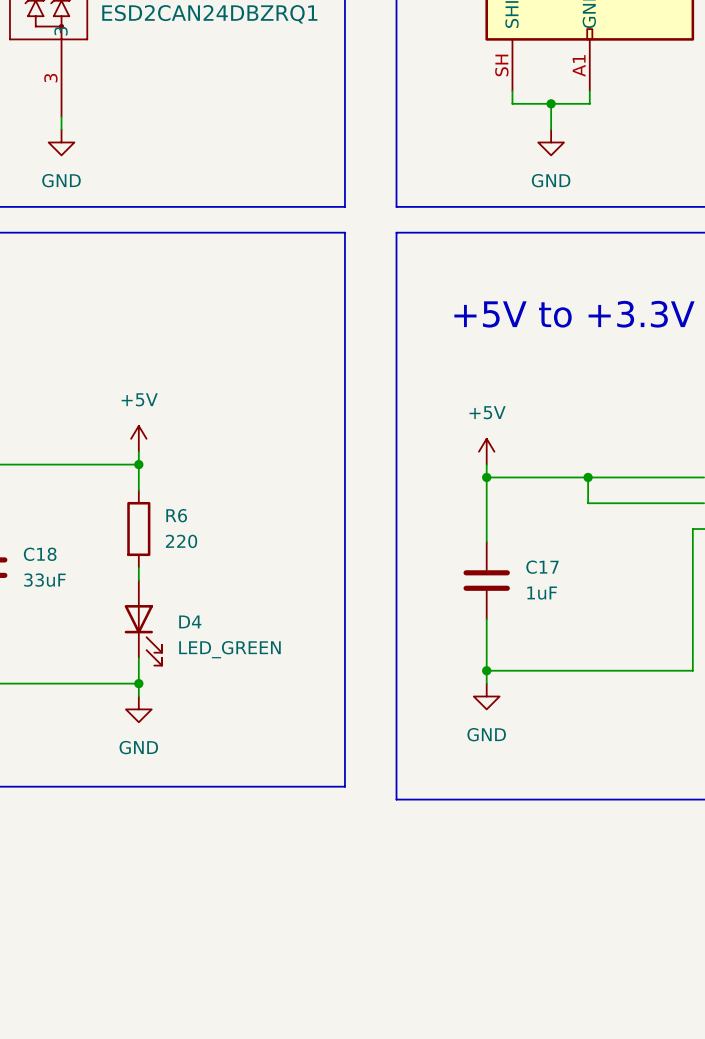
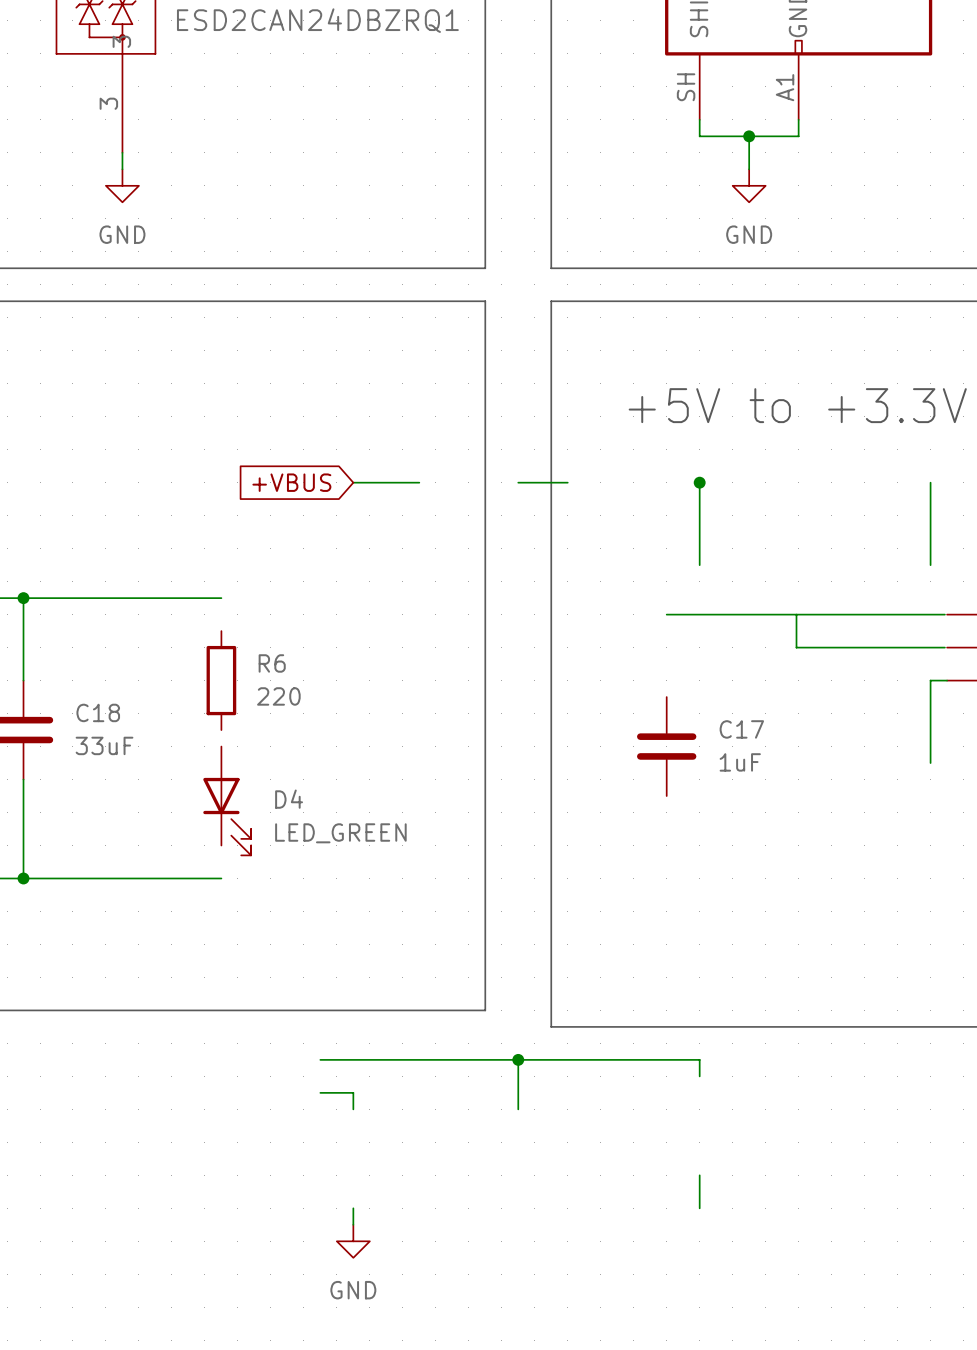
global label: none -> +VBUS (291, 482)
wire: none -> (353, 482) (419, 482)
wire: none -> (518, 482) (567, 482)
junction: none -> (699, 482)
wire: none -> (930, 482) (930, 565)
power symbol: +5V (138, 438) -> none
wire: (138, 451) (138, 490) -> none
power symbol: +5V (486, 451) -> none
junction: (138, 464) -> none
wire: (486, 464) (486, 541) -> none
junction: (486, 477) -> none
junction: (588, 477) -> none
wire: (138, 567) (138, 580) -> none
wire: (692, 593) (692, 670) (486, 670) -> none
wire: (486, 619) (486, 683) -> (699, 482) (699, 565)
wire: (138, 657) (138, 696) -> none
junction: (486, 670) -> none
junction: (138, 683) -> none
power symbol: GND (486, 696) -> none
power symbol: GND (138, 709) -> none
wire: none -> (320, 1059) (699, 1059) (699, 1076)
wire: none -> (518, 1059) (518, 1109)
junction: none -> (518, 1059)
wire: none -> (320, 1092) (353, 1092) (353, 1109)
wire: none -> (699, 1175) (699, 1208)
wire: none -> (353, 1208) (353, 1224)
power symbol: none -> GND (353, 1241)

